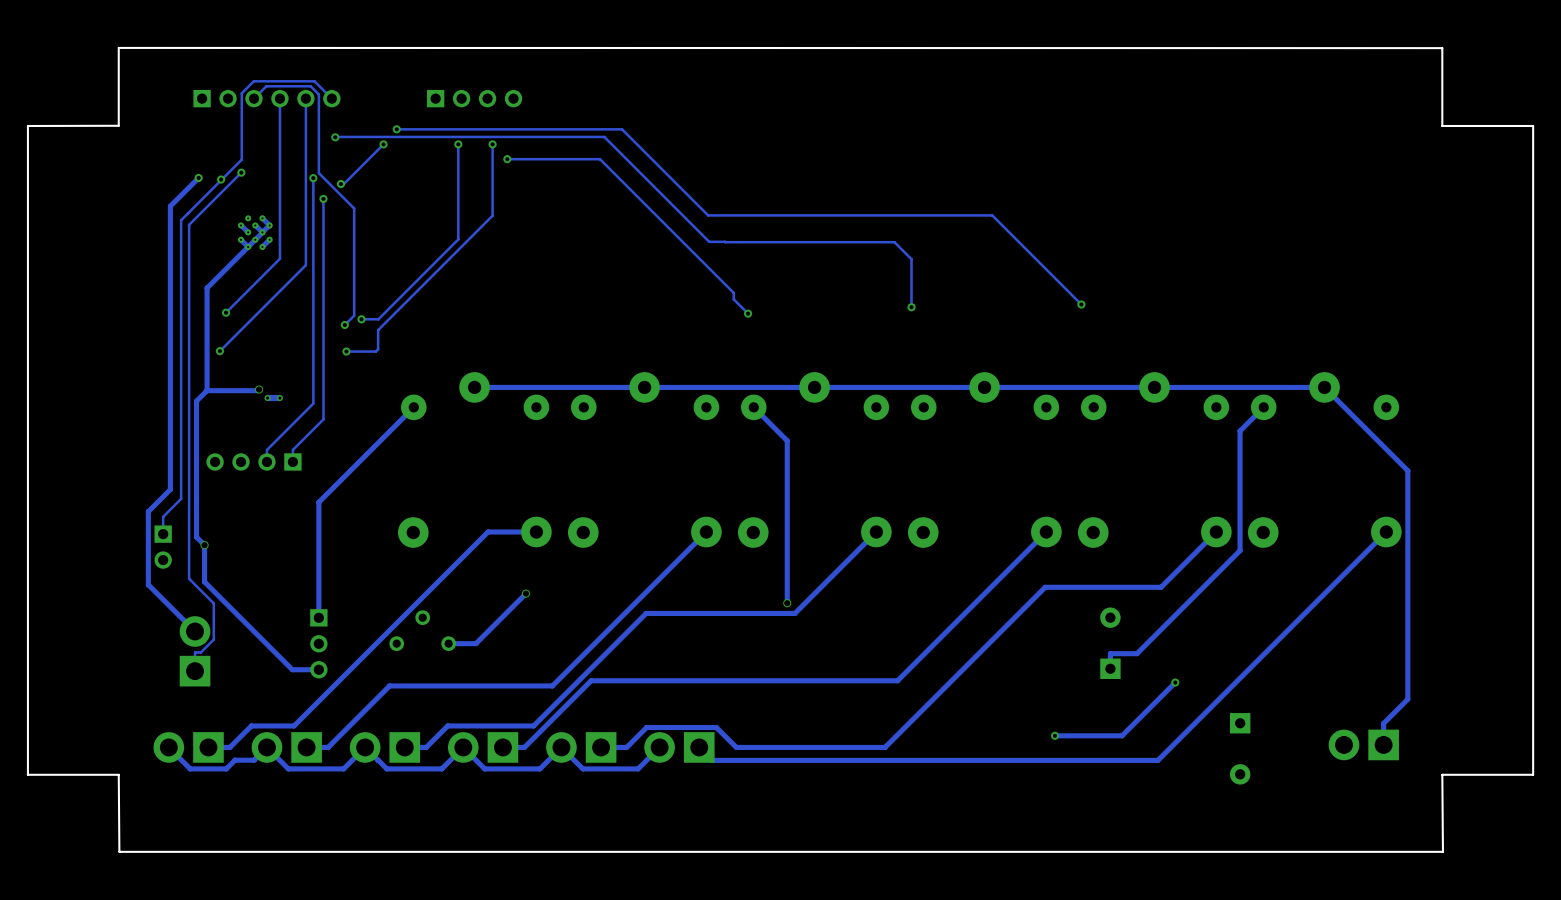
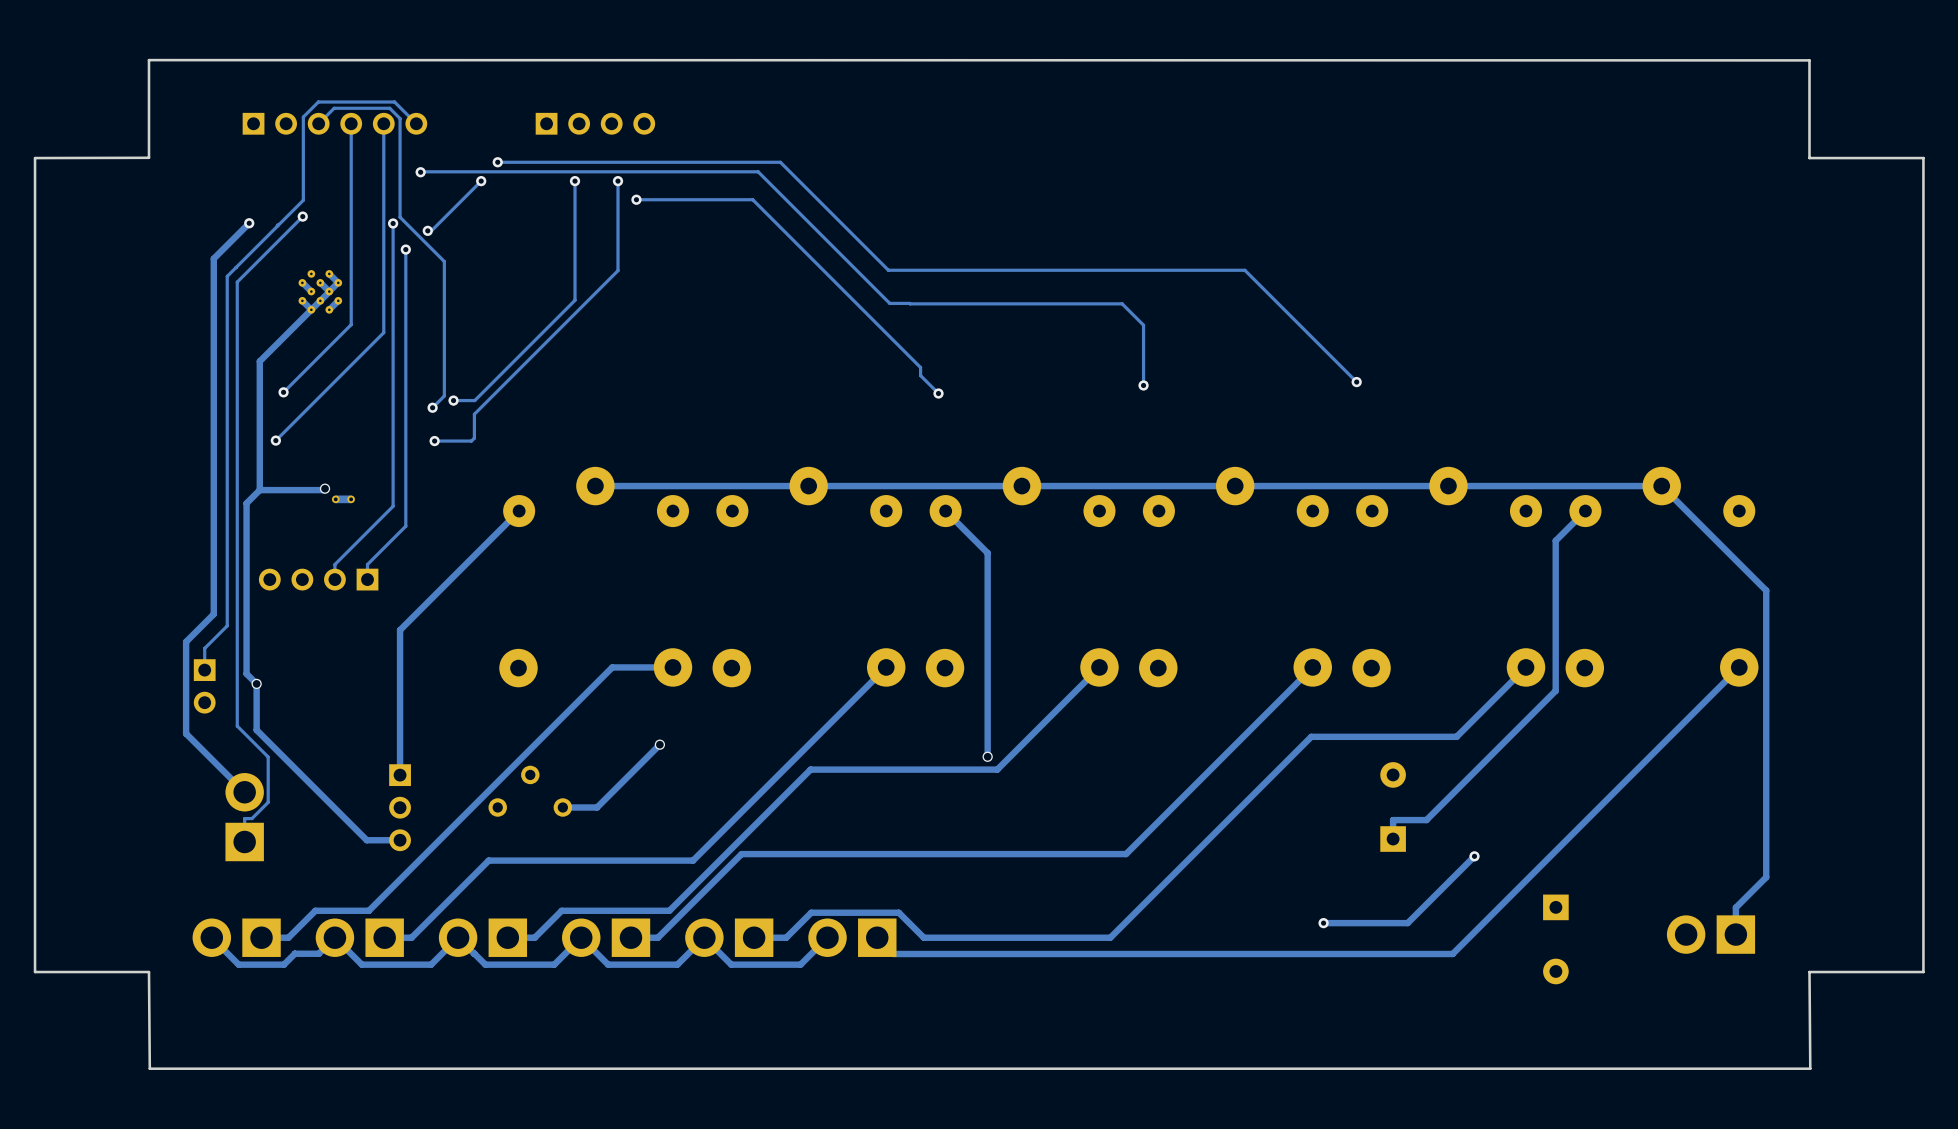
via: (221, 179) -> none

